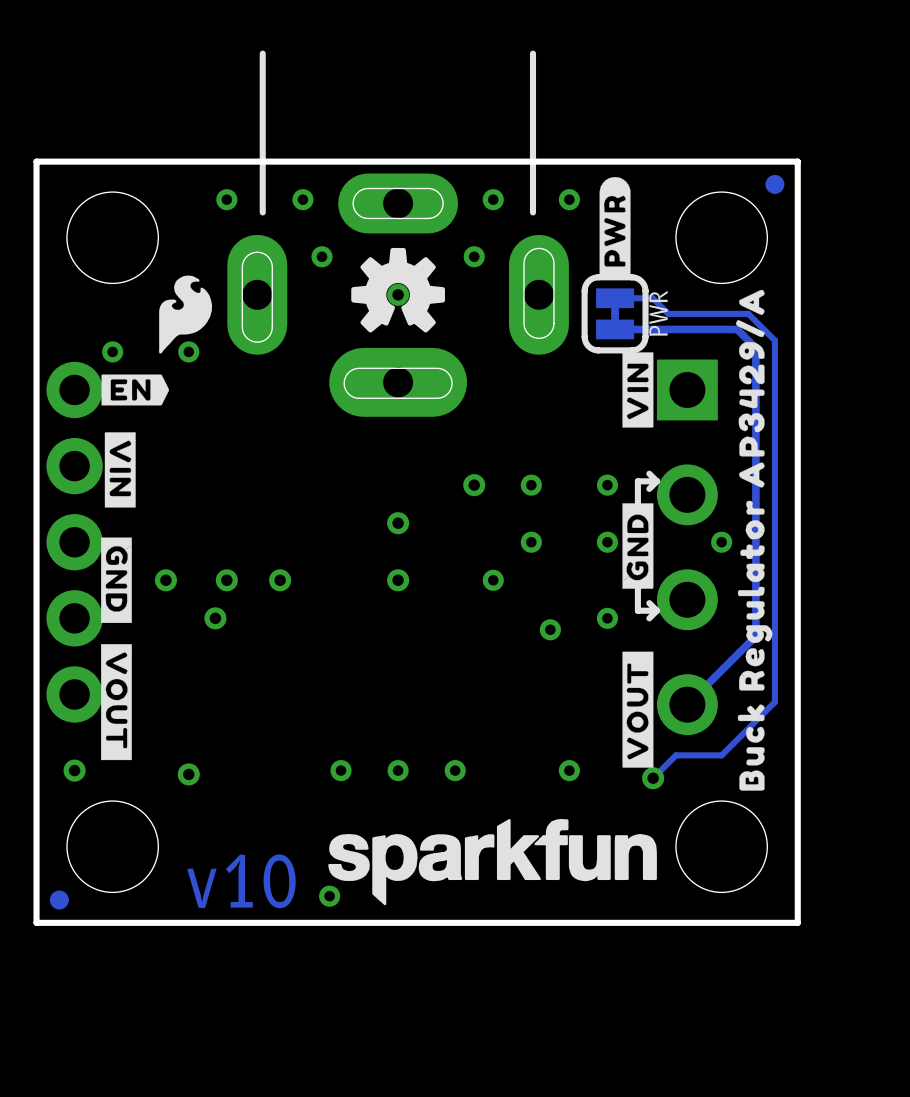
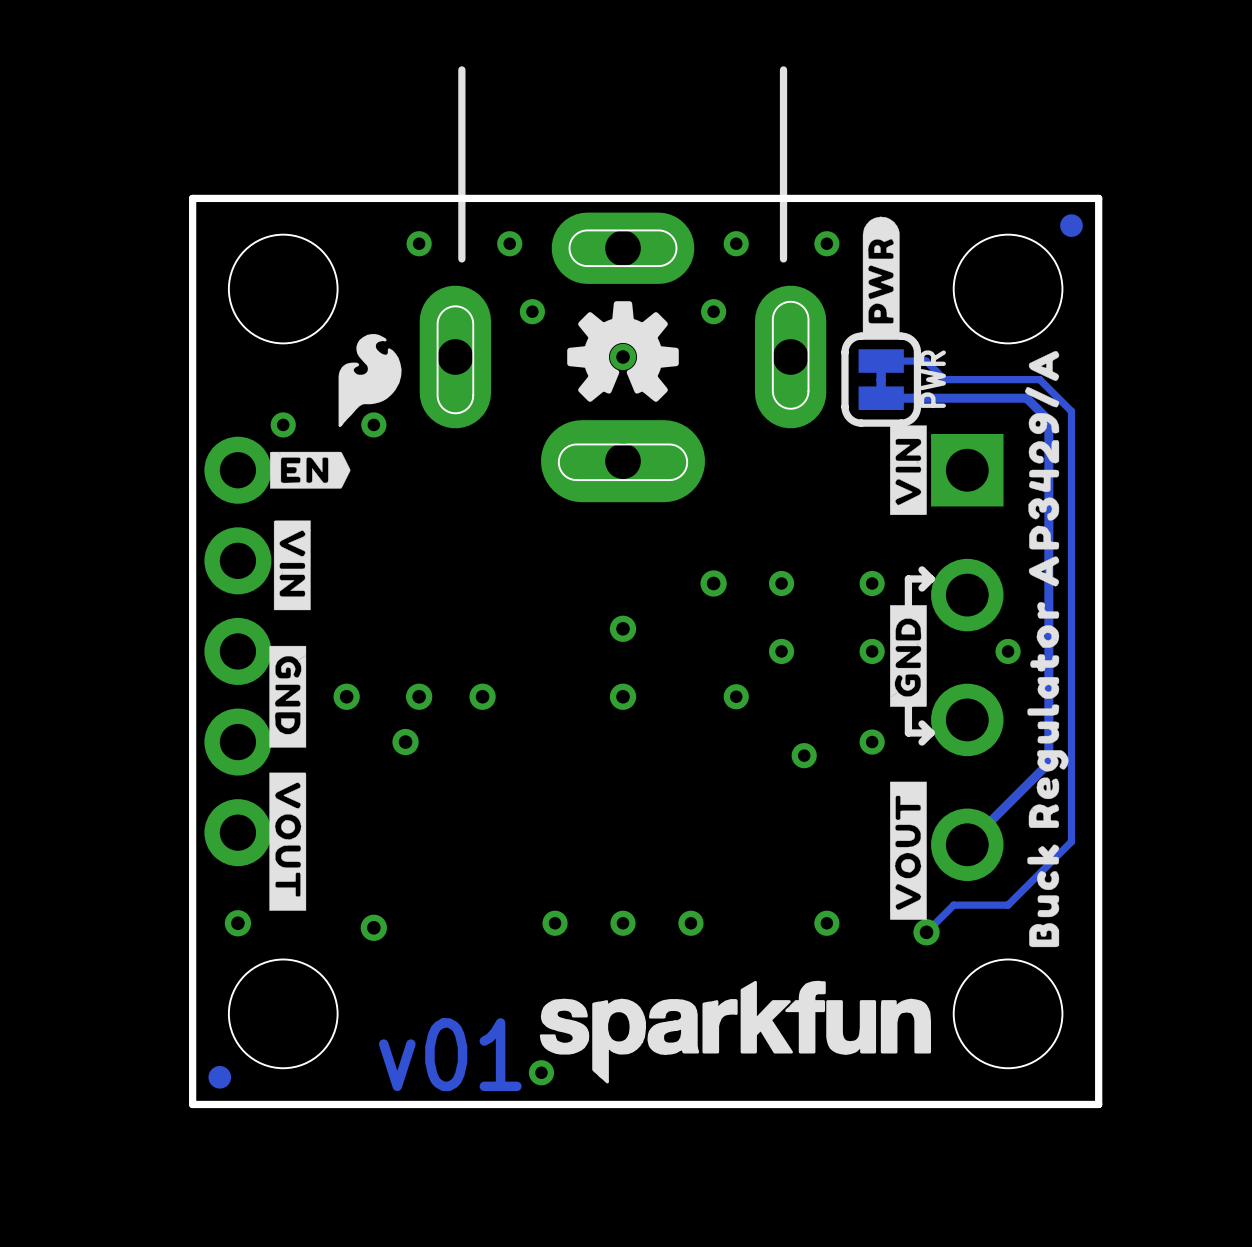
text: v10 (241, 881) -> v01 (450, 1054)

